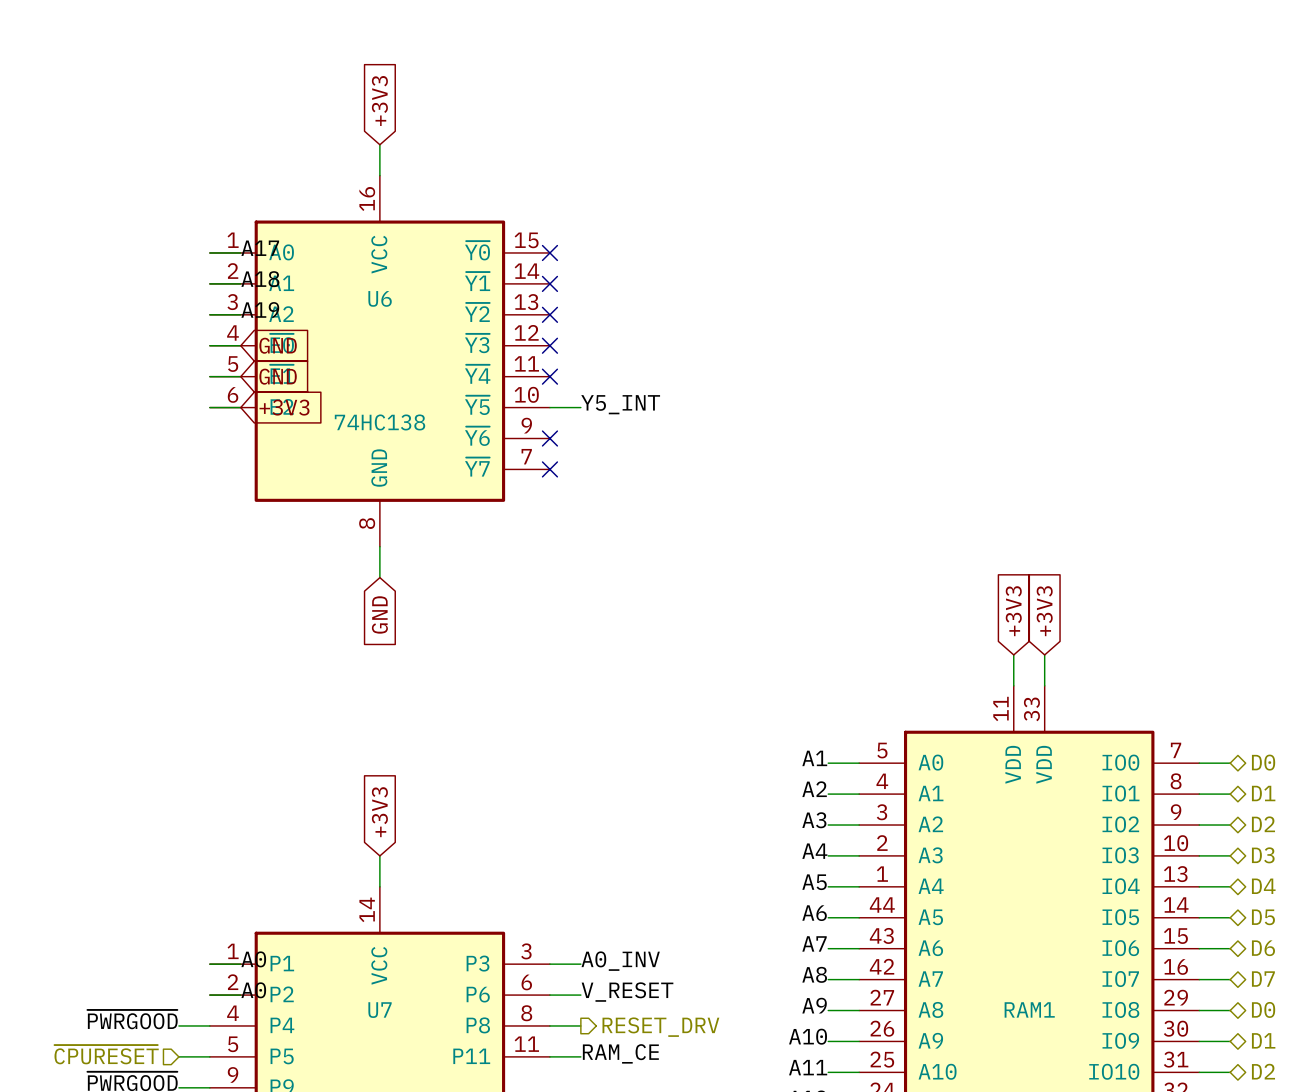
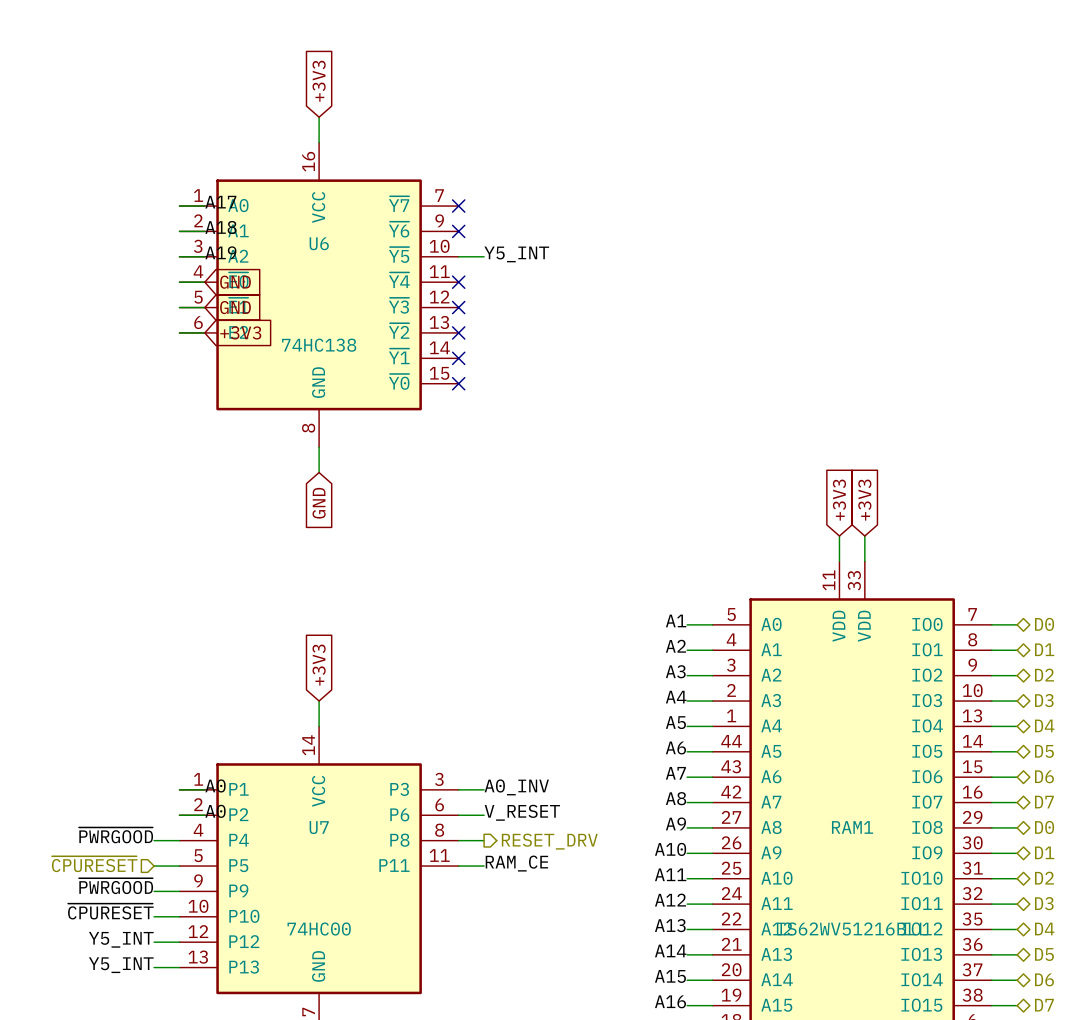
U6 symbol: [209, 175, 550, 547] -> [179, 142, 459, 448]
no-connect mark: (549, 314) -> none
label position: Y5_INT (620, 404) -> Y5_INT (516, 254)
wire: (549, 407) (580, 407) -> (458, 256) (484, 256)
no-connect mark: none -> (458, 332)

